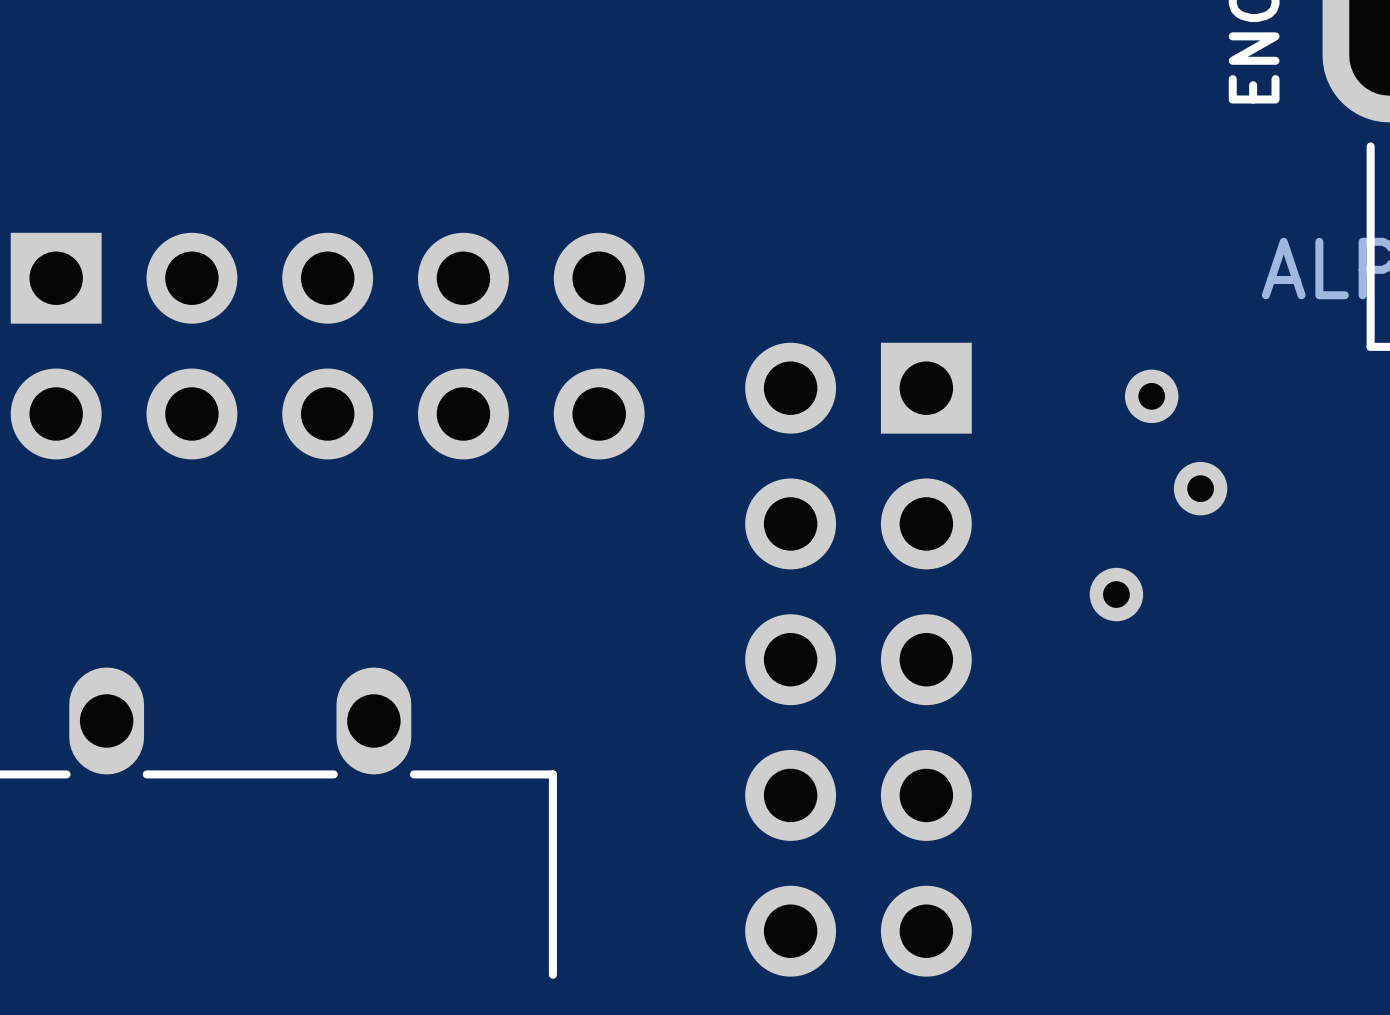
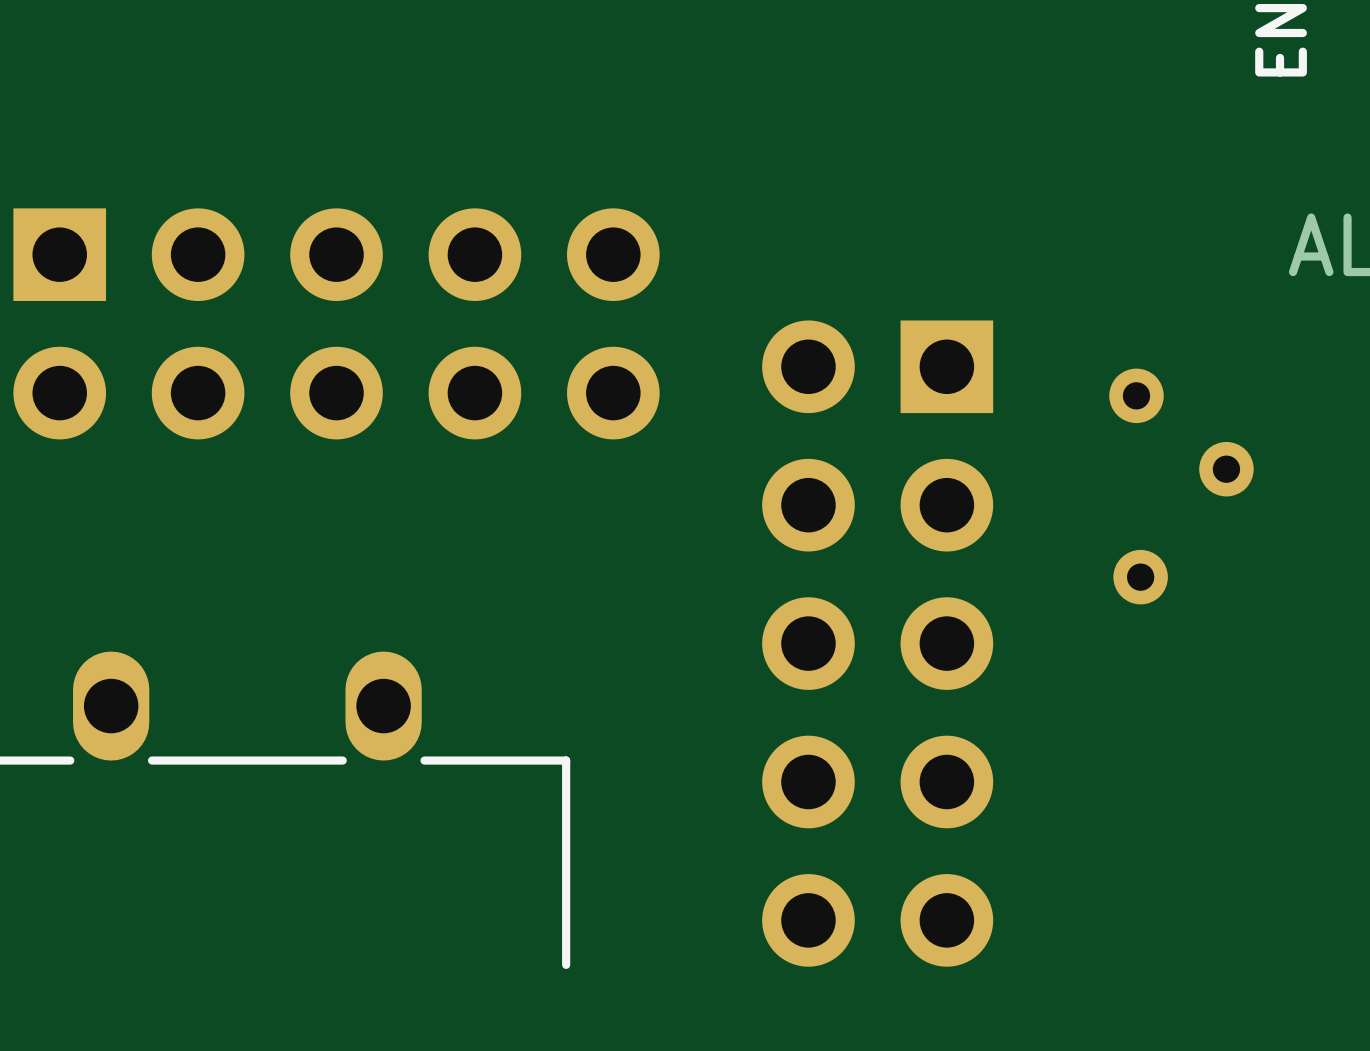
part position: (1151, 396) -> (1136, 395)

